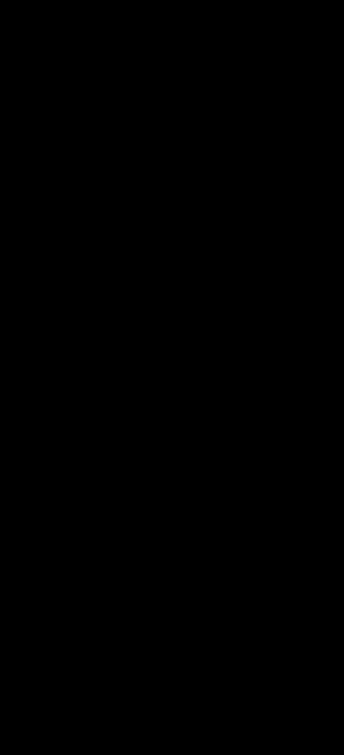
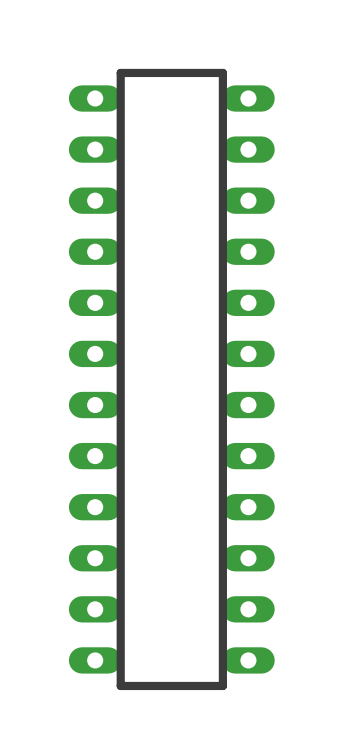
part: none -> (171, 379)

